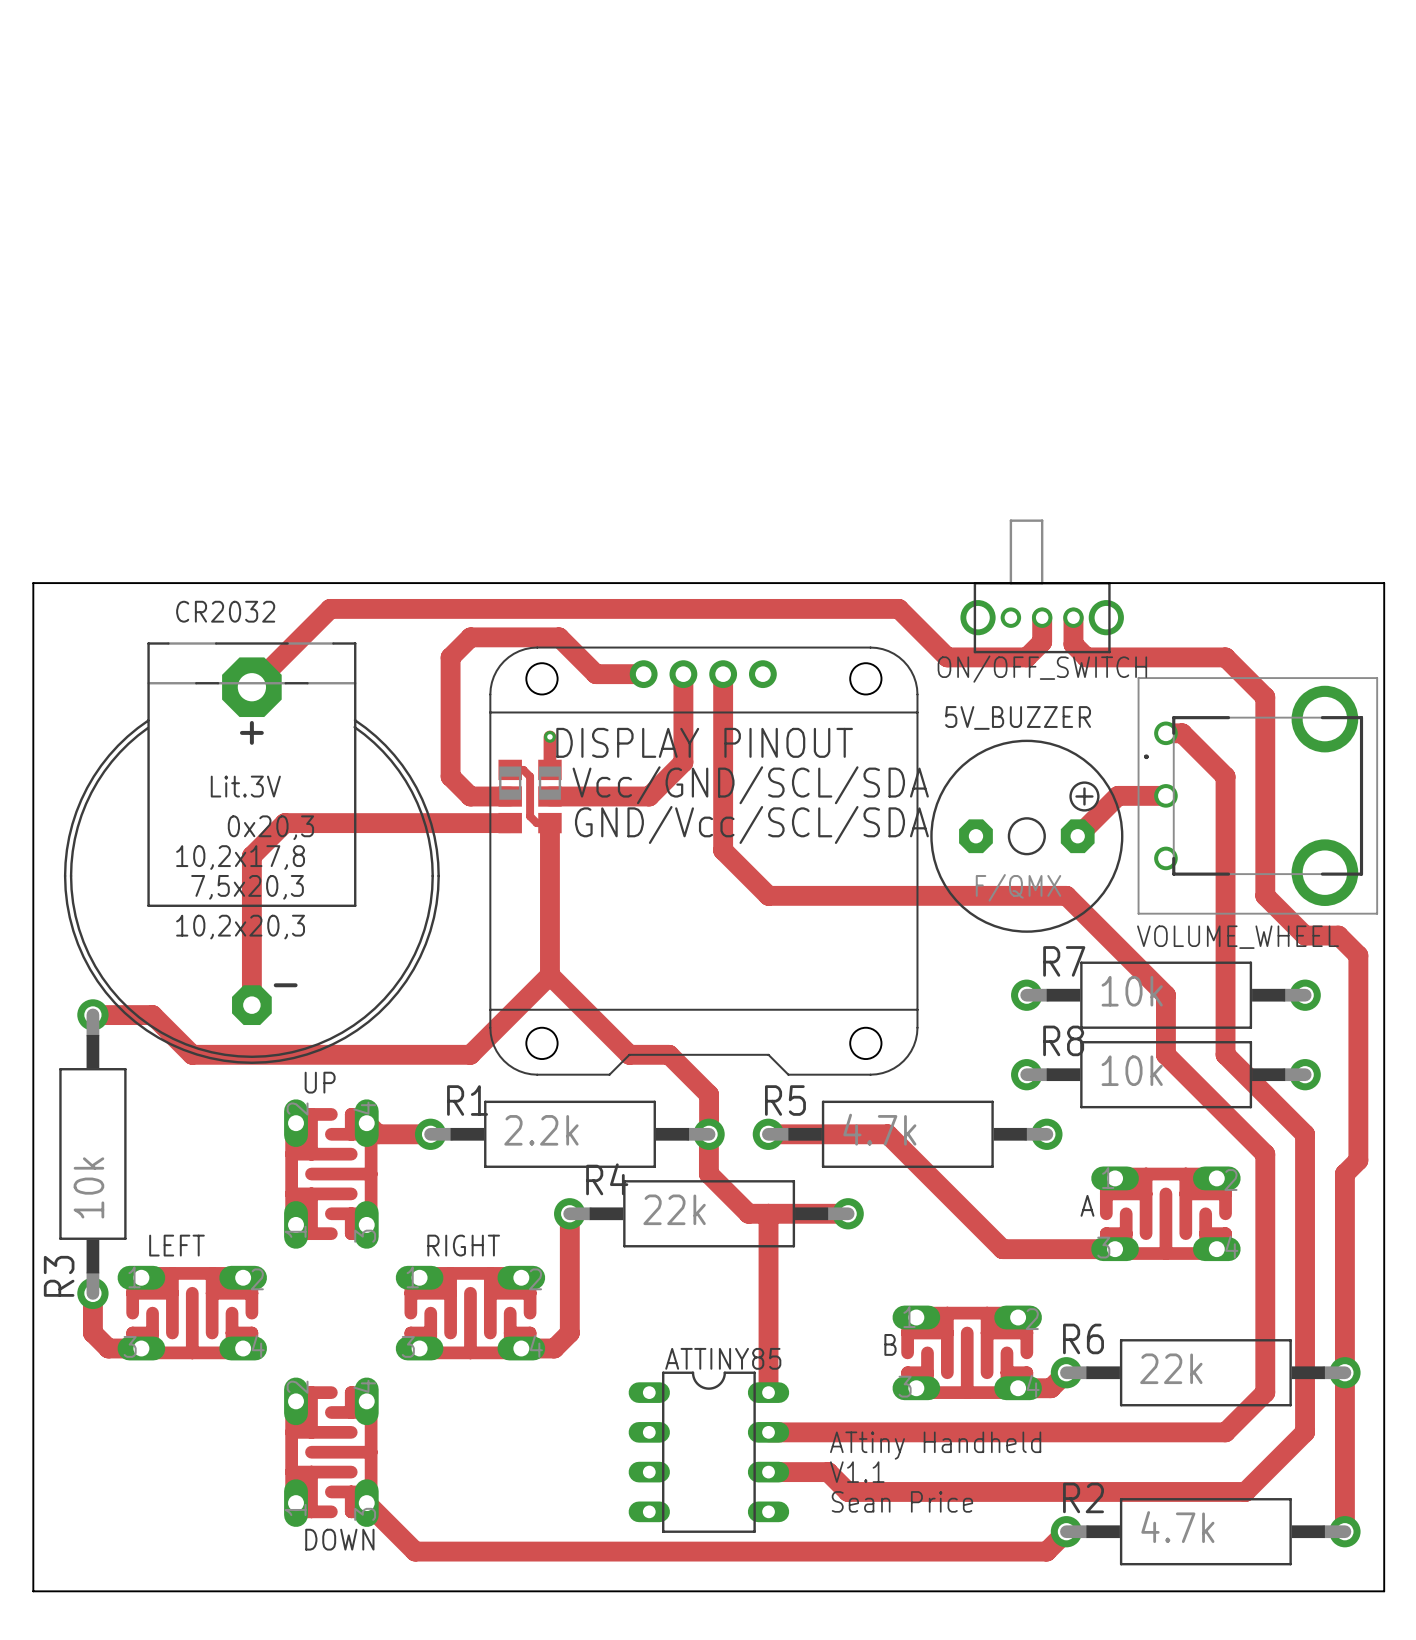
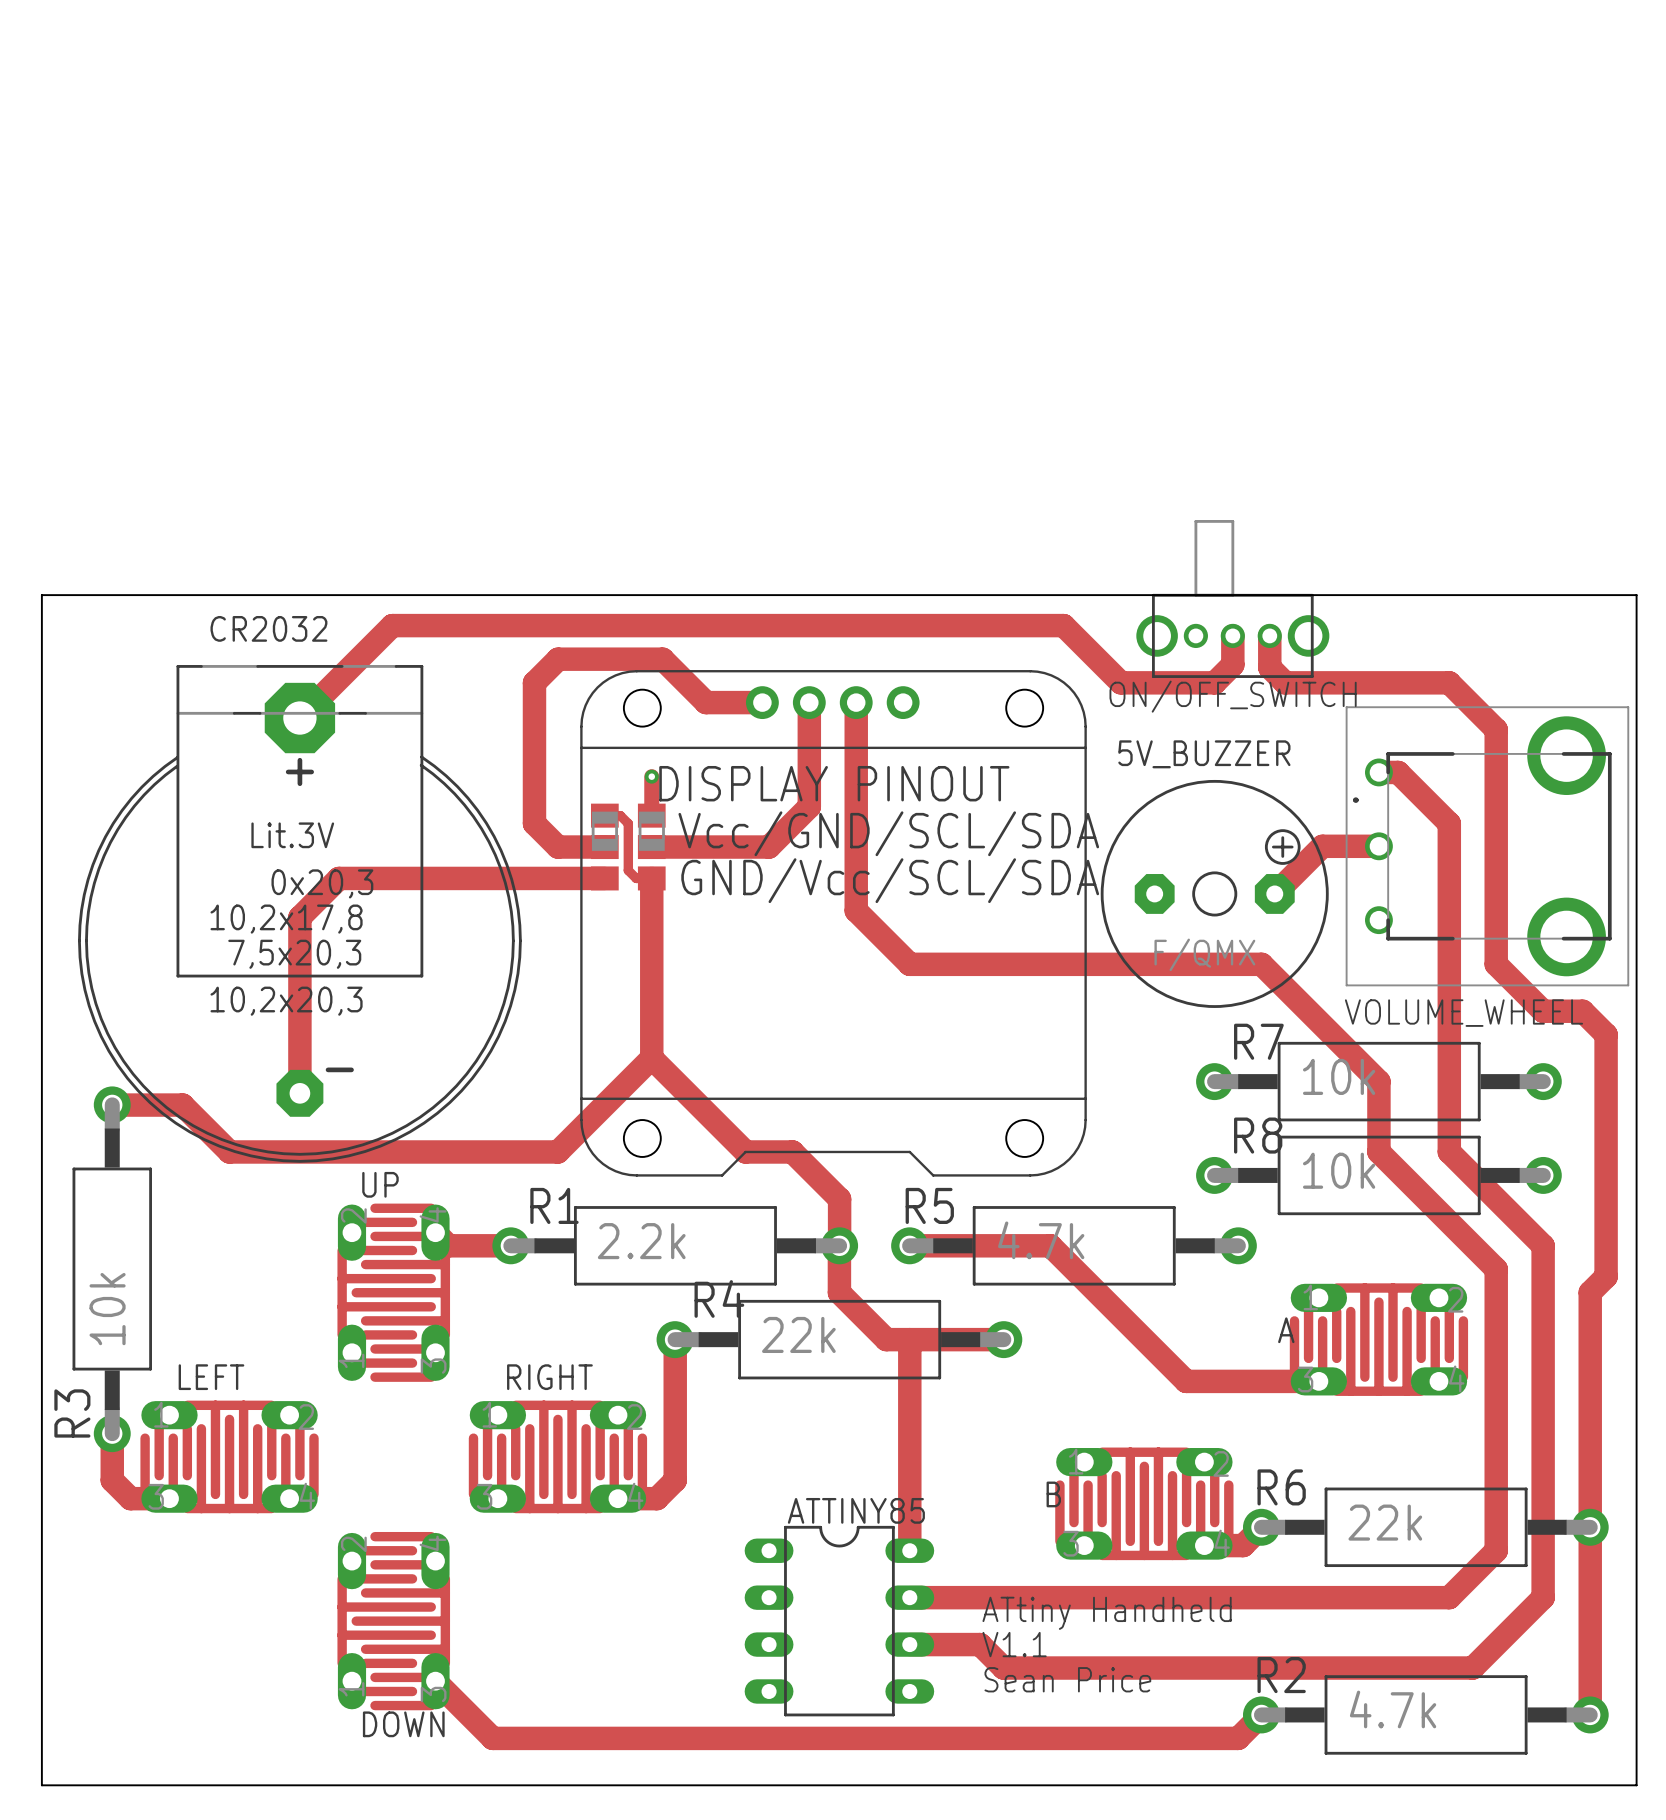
UP footprint: [284, 1099, 379, 1249] -> [337, 1203, 451, 1382]
A footprint: [1091, 1166, 1241, 1262] -> [1289, 1283, 1469, 1396]
LEFT footprint: [117, 1265, 267, 1361] -> [140, 1400, 319, 1514]
RIGHT footprint: [395, 1265, 546, 1361] -> [468, 1400, 648, 1514]
B footprint: [892, 1305, 1042, 1401] -> [1055, 1447, 1234, 1561]
DOWN footprint: [284, 1377, 379, 1527] -> [337, 1531, 451, 1711]

